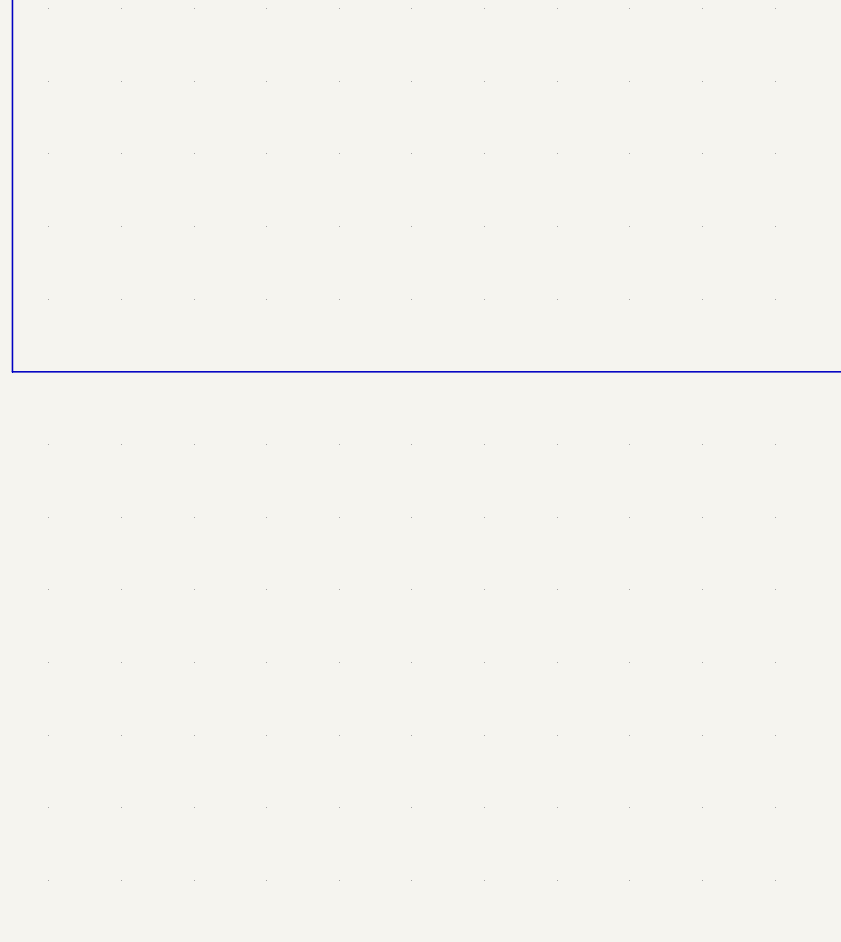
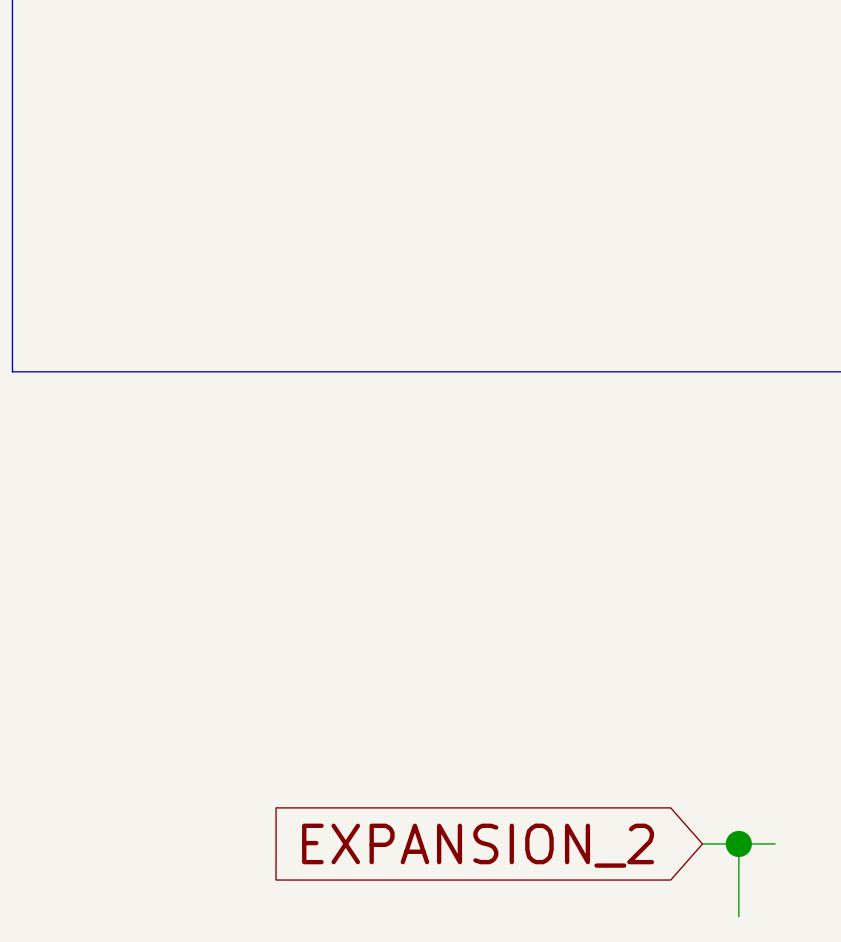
wire: none -> (702, 843) (775, 843)
wire: none -> (738, 843) (738, 916)
junction: none -> (738, 843)
global label: none -> EXPANSION_2 (478, 845)

